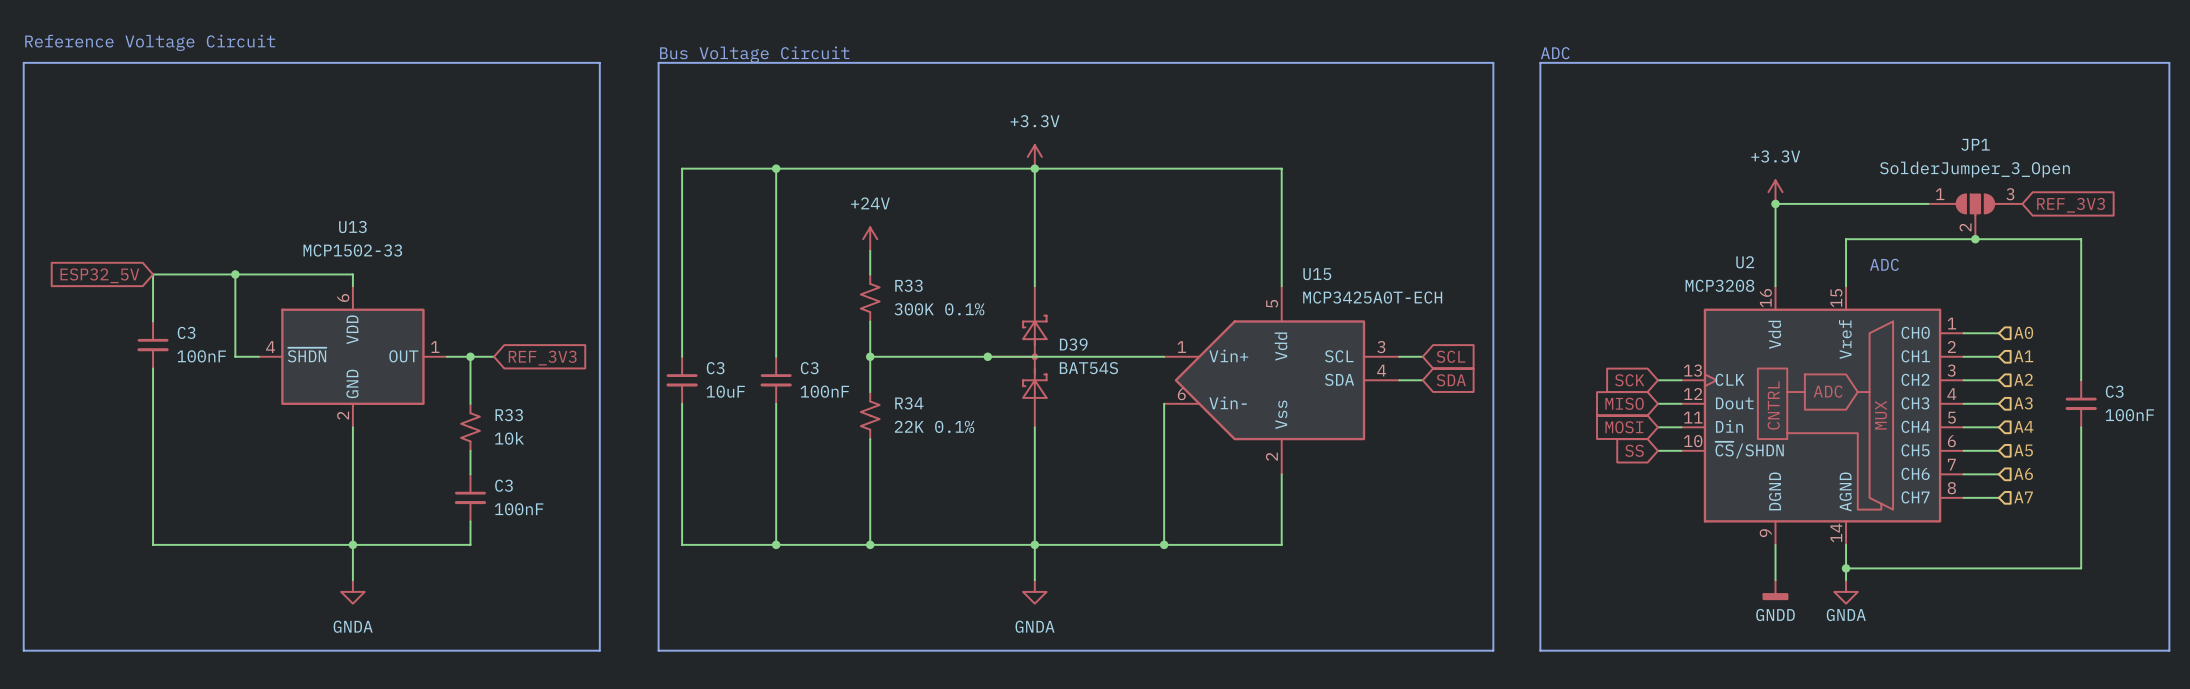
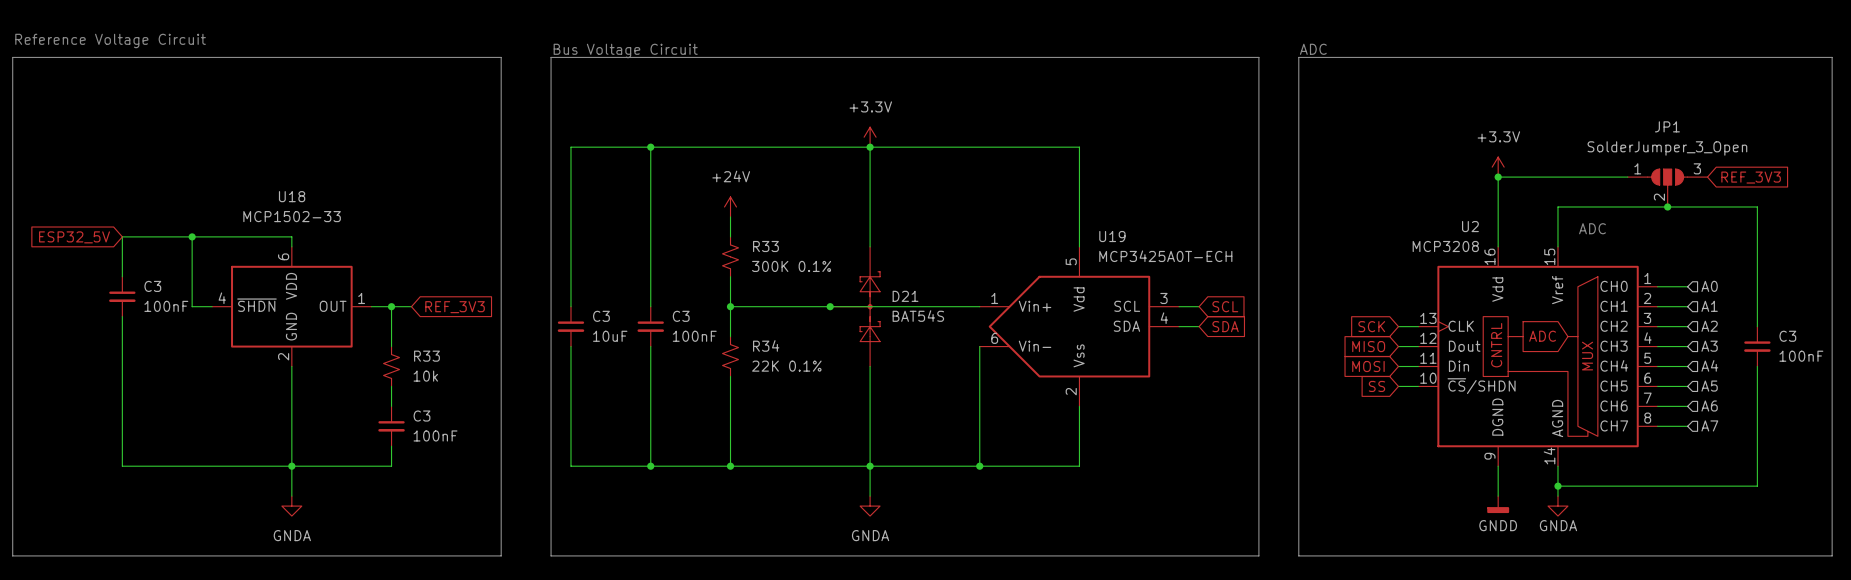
U13 name: U13 (352, 227) -> U18 (292, 196)
U15 name: U15 (1317, 274) -> U19 (1112, 236)
D39 name: D39 (1073, 344) -> D21 (905, 296)

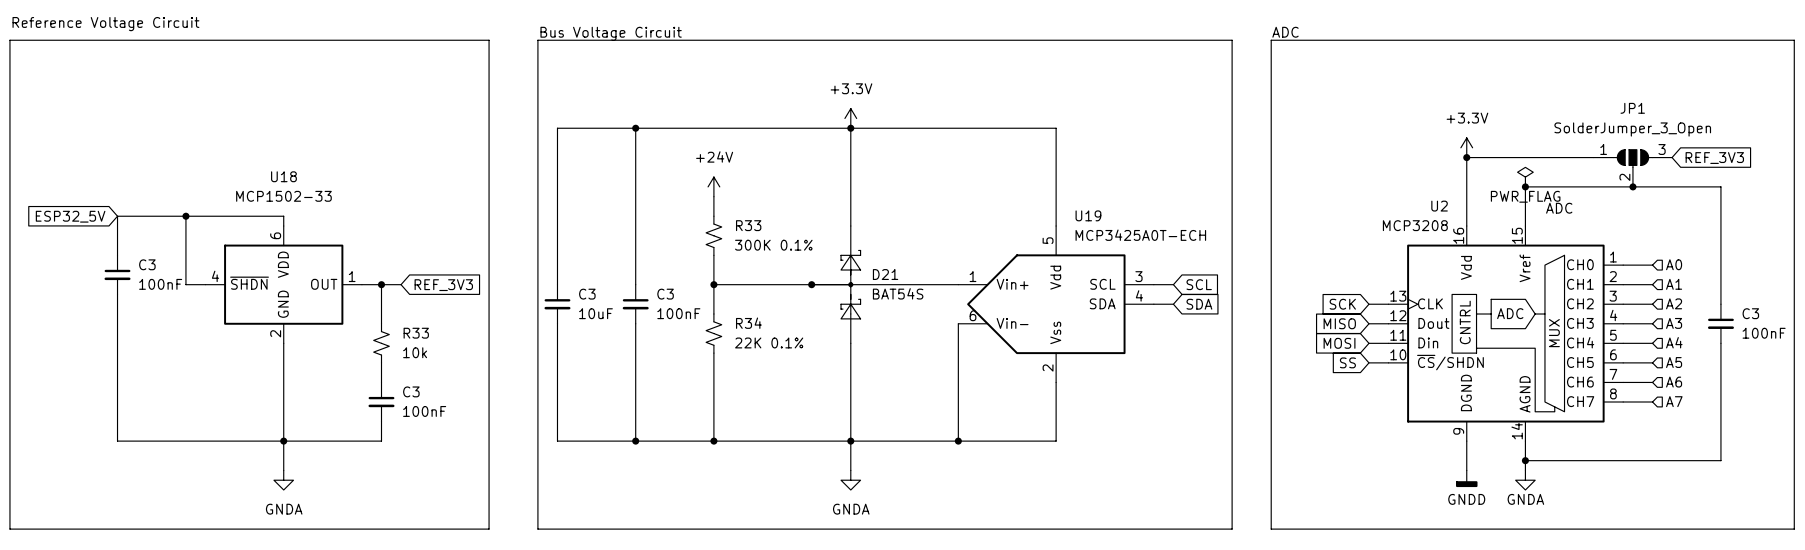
power symbol: none -> PWR_FLAG (1525, 177)
junction: none -> (1525, 186)

